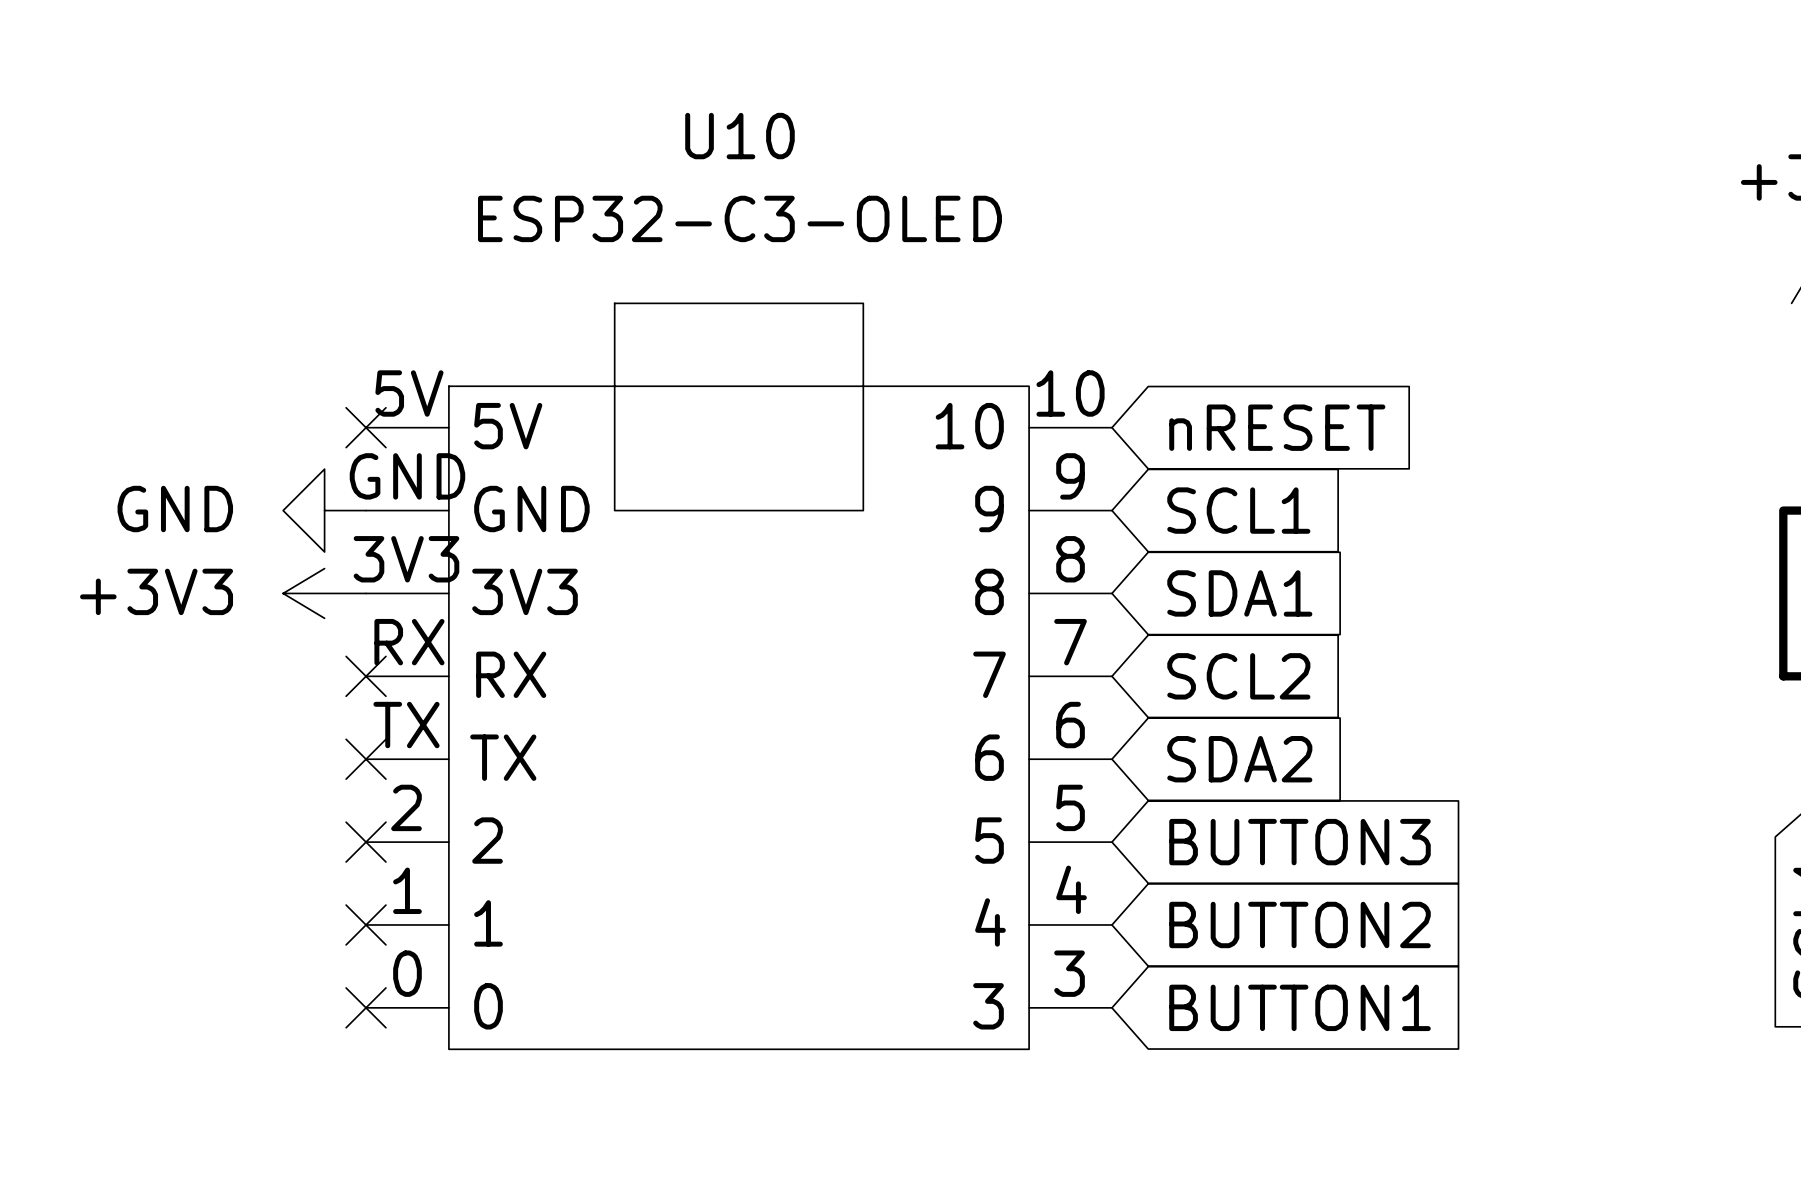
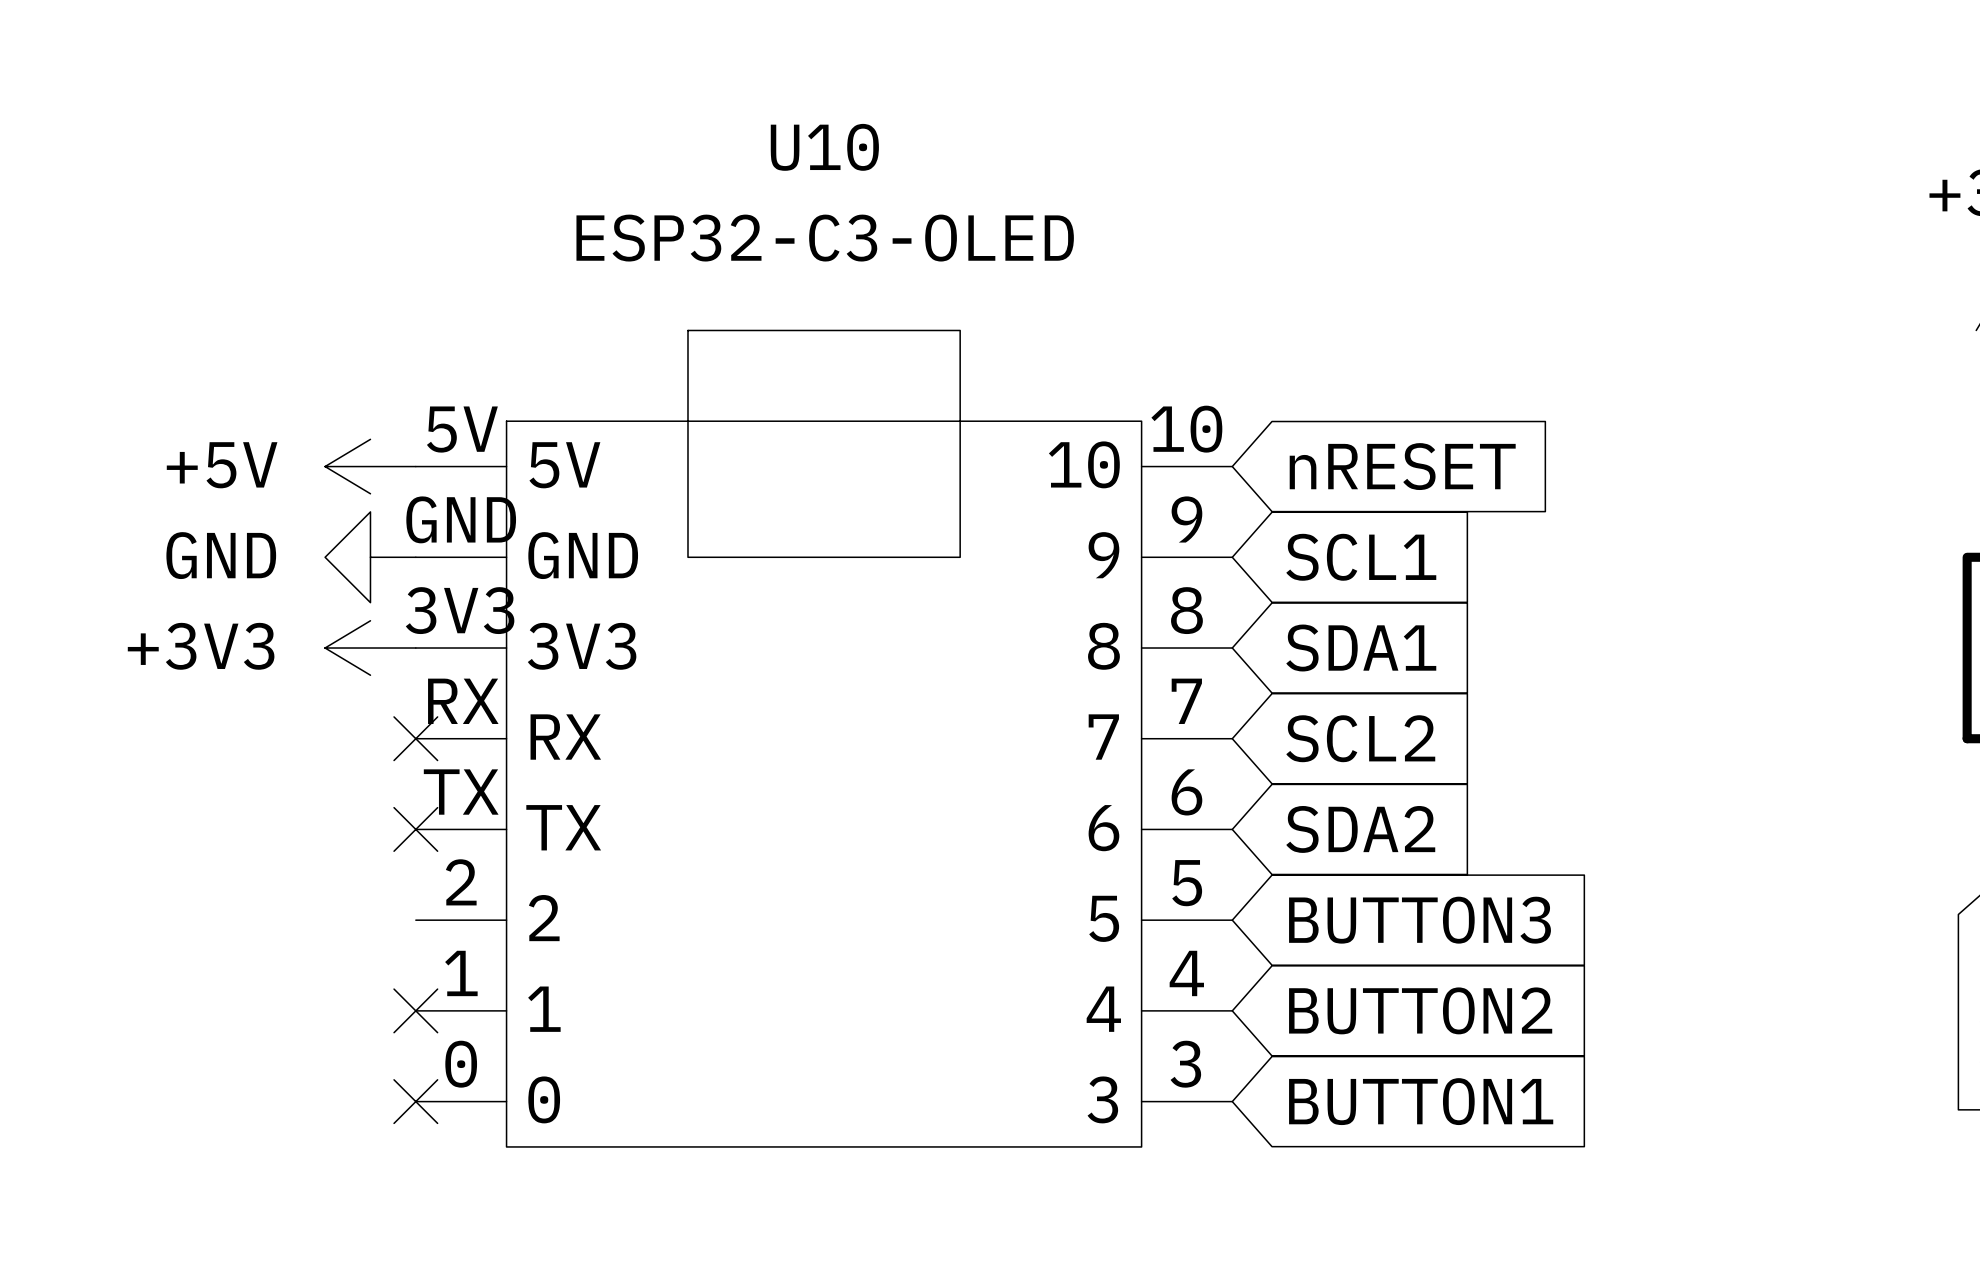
power symbol: none -> +5V (370, 466)
no-connect mark: (366, 427) -> none
no-connect mark: (366, 842) -> none

